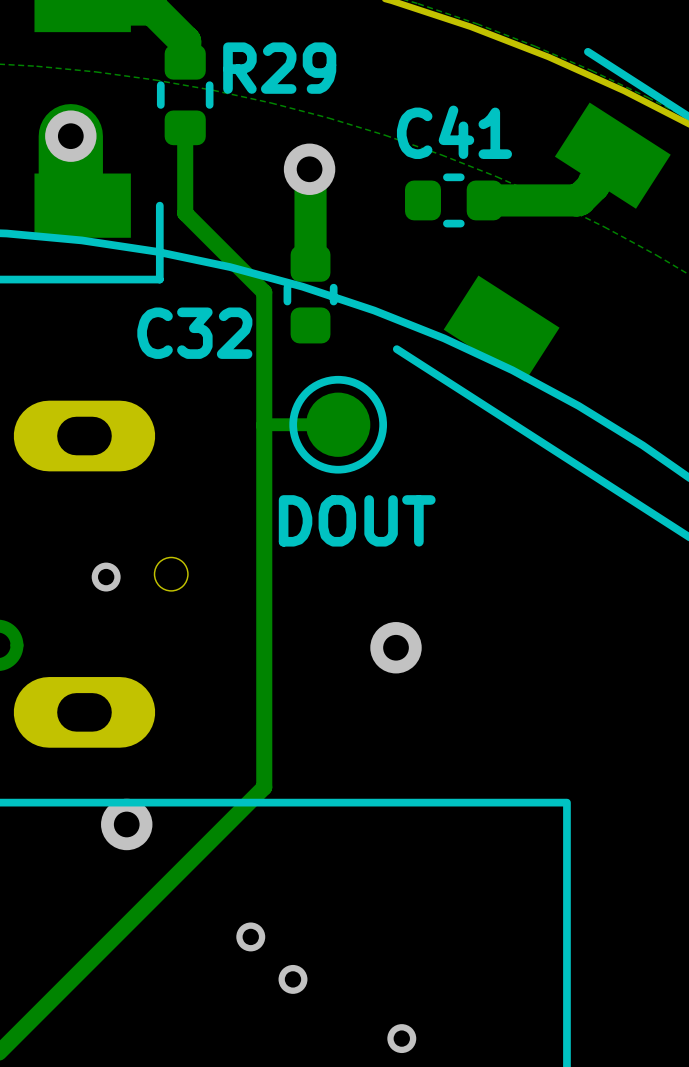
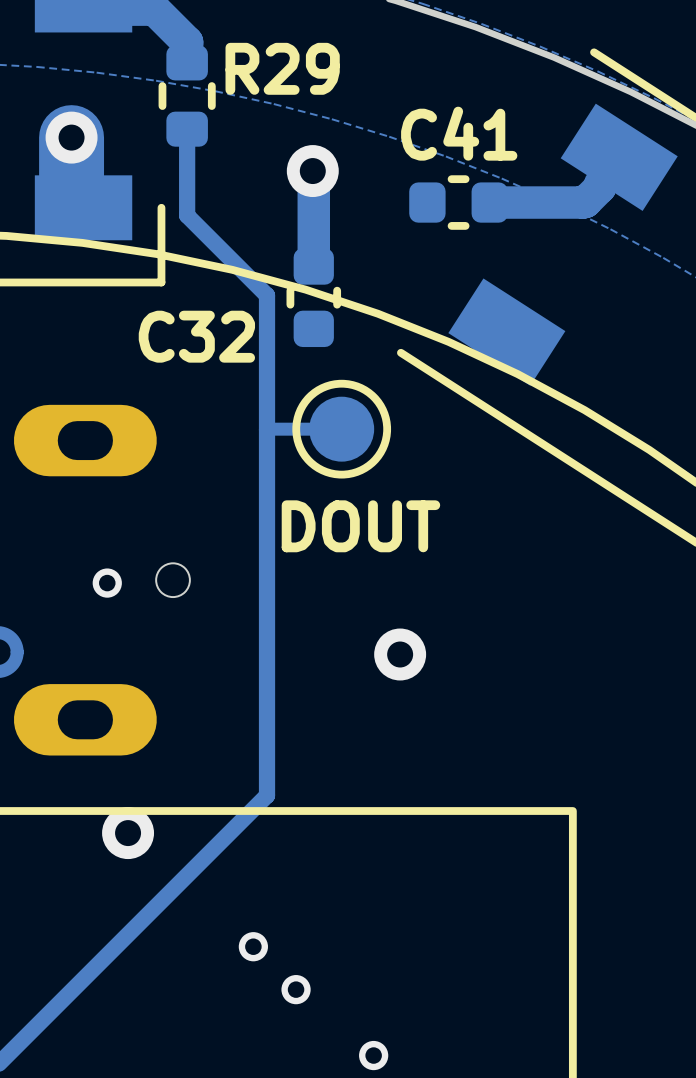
via: (401, 1038) -> none
via: none -> (373, 1055)

